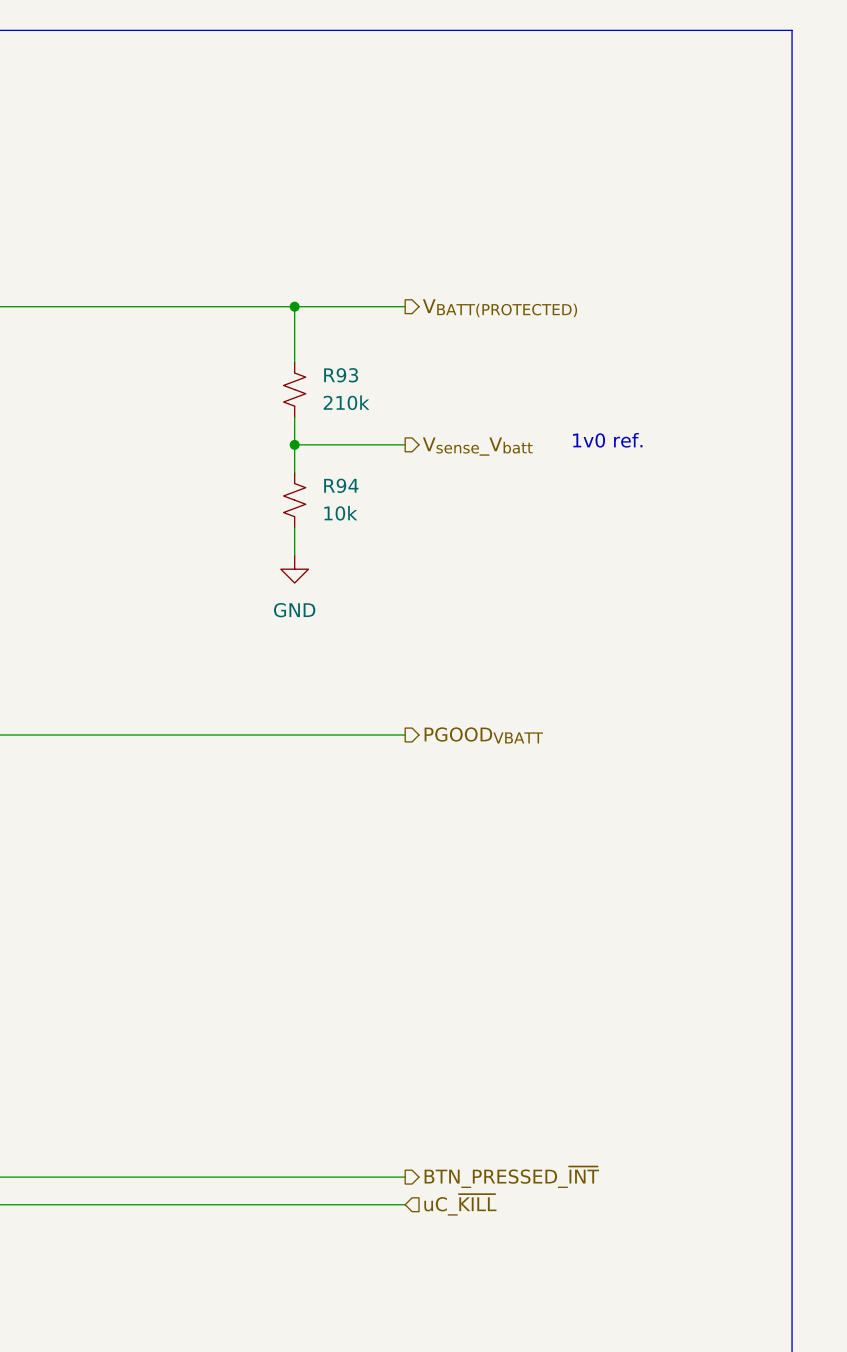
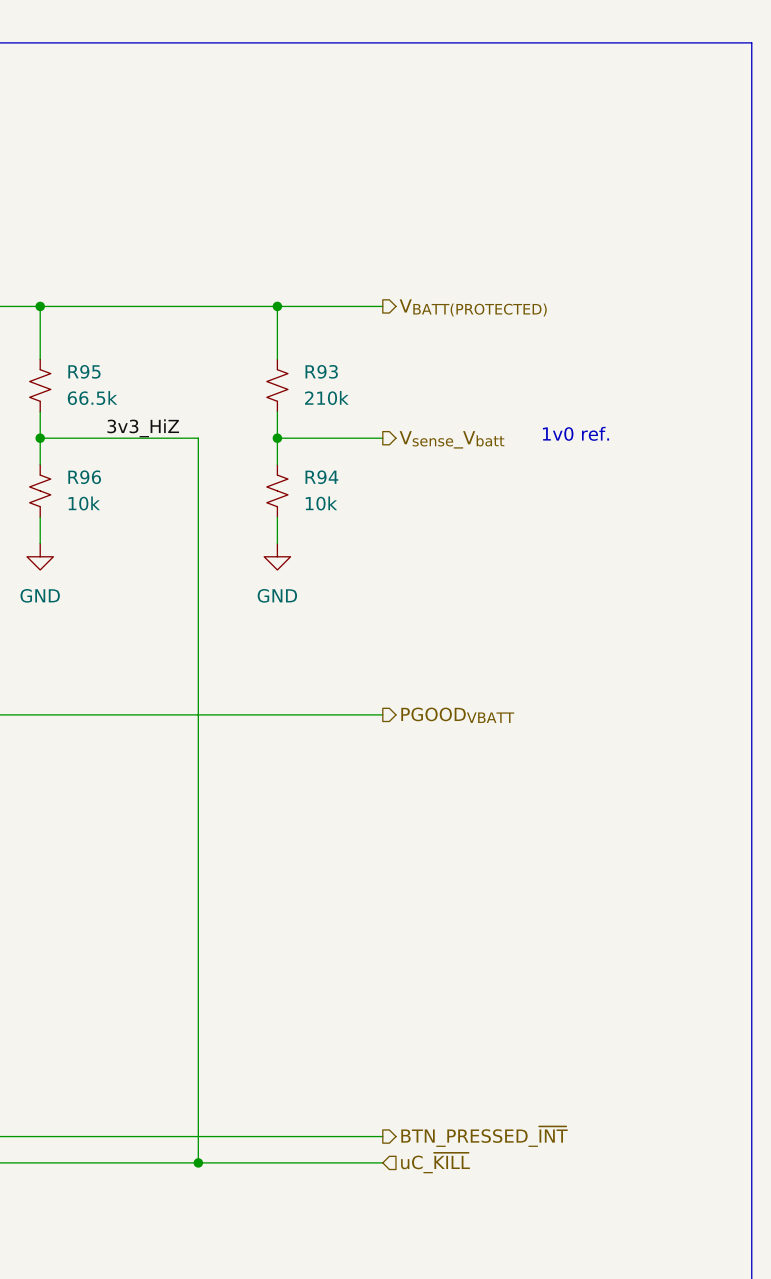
wire: none -> (40, 306) (40, 359)
junction: none -> (40, 306)
R95: none -> 66.5k (40, 385)
wire: none -> (40, 411) (40, 464)
label: none -> 3v3_HiZ (143, 428)
wire: none -> (40, 438) (198, 438) (198, 1162)
junction: none -> (40, 438)
R96: none -> 10k (40, 490)
wire: none -> (40, 517) (40, 543)
power symbol: none -> GND (40, 556)
junction: none -> (198, 1162)

